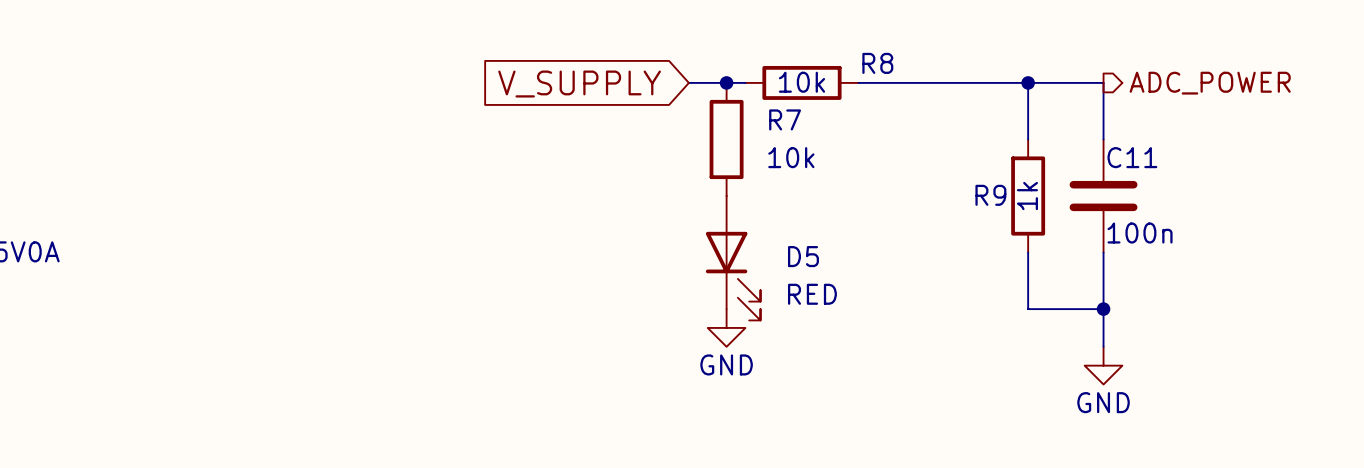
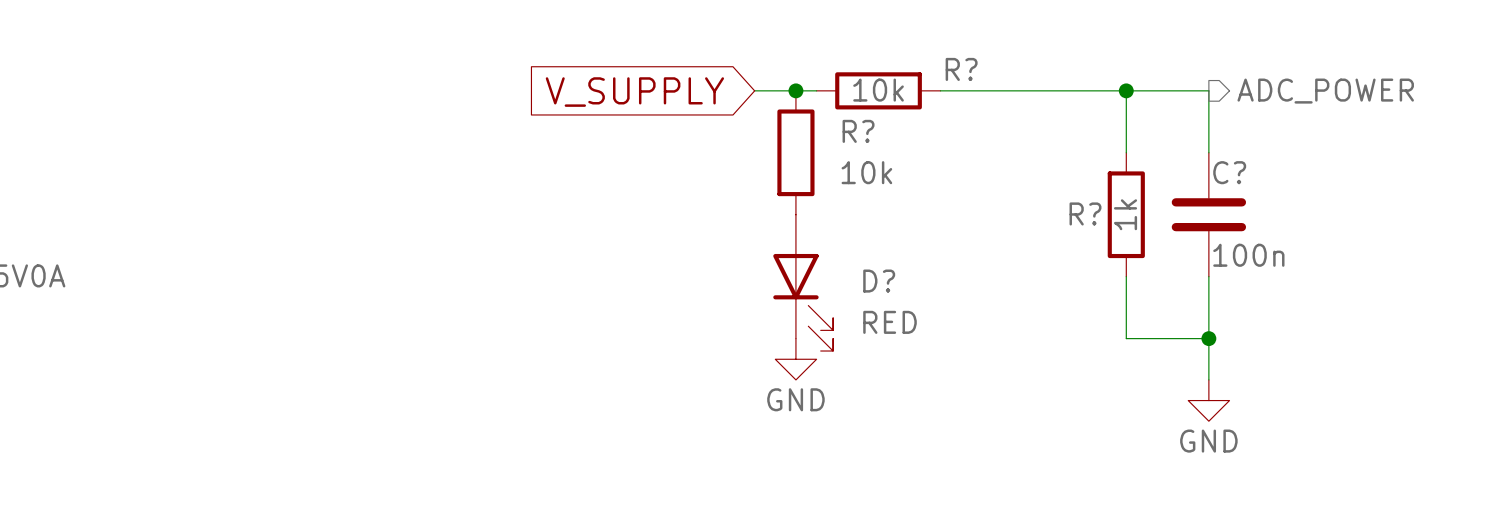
R8 name: R8 (877, 63) -> R? (961, 69)
R7 name: R7 (785, 119) -> R? (858, 131)
C11 name: C11 (1132, 157) -> C? (1229, 172)
R9 name: R9 (990, 195) -> R? (1085, 213)
D5 name: D5 (803, 256) -> D? (879, 281)

